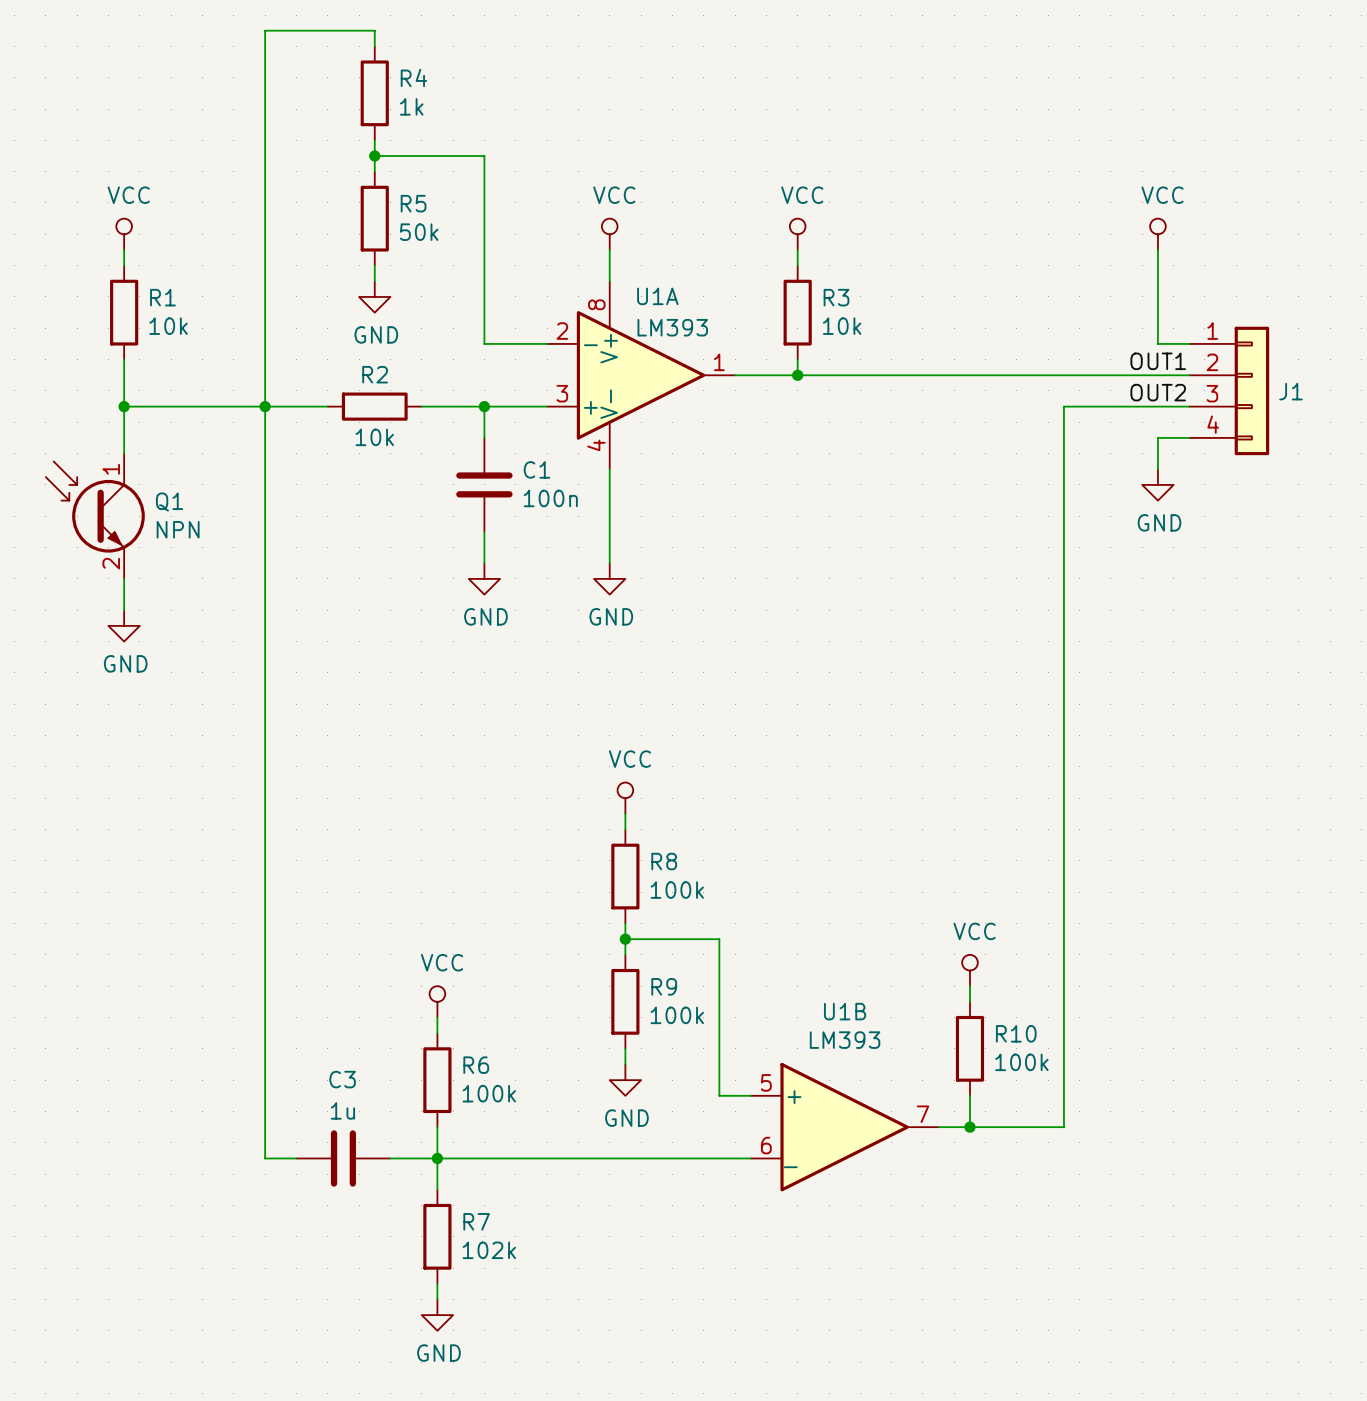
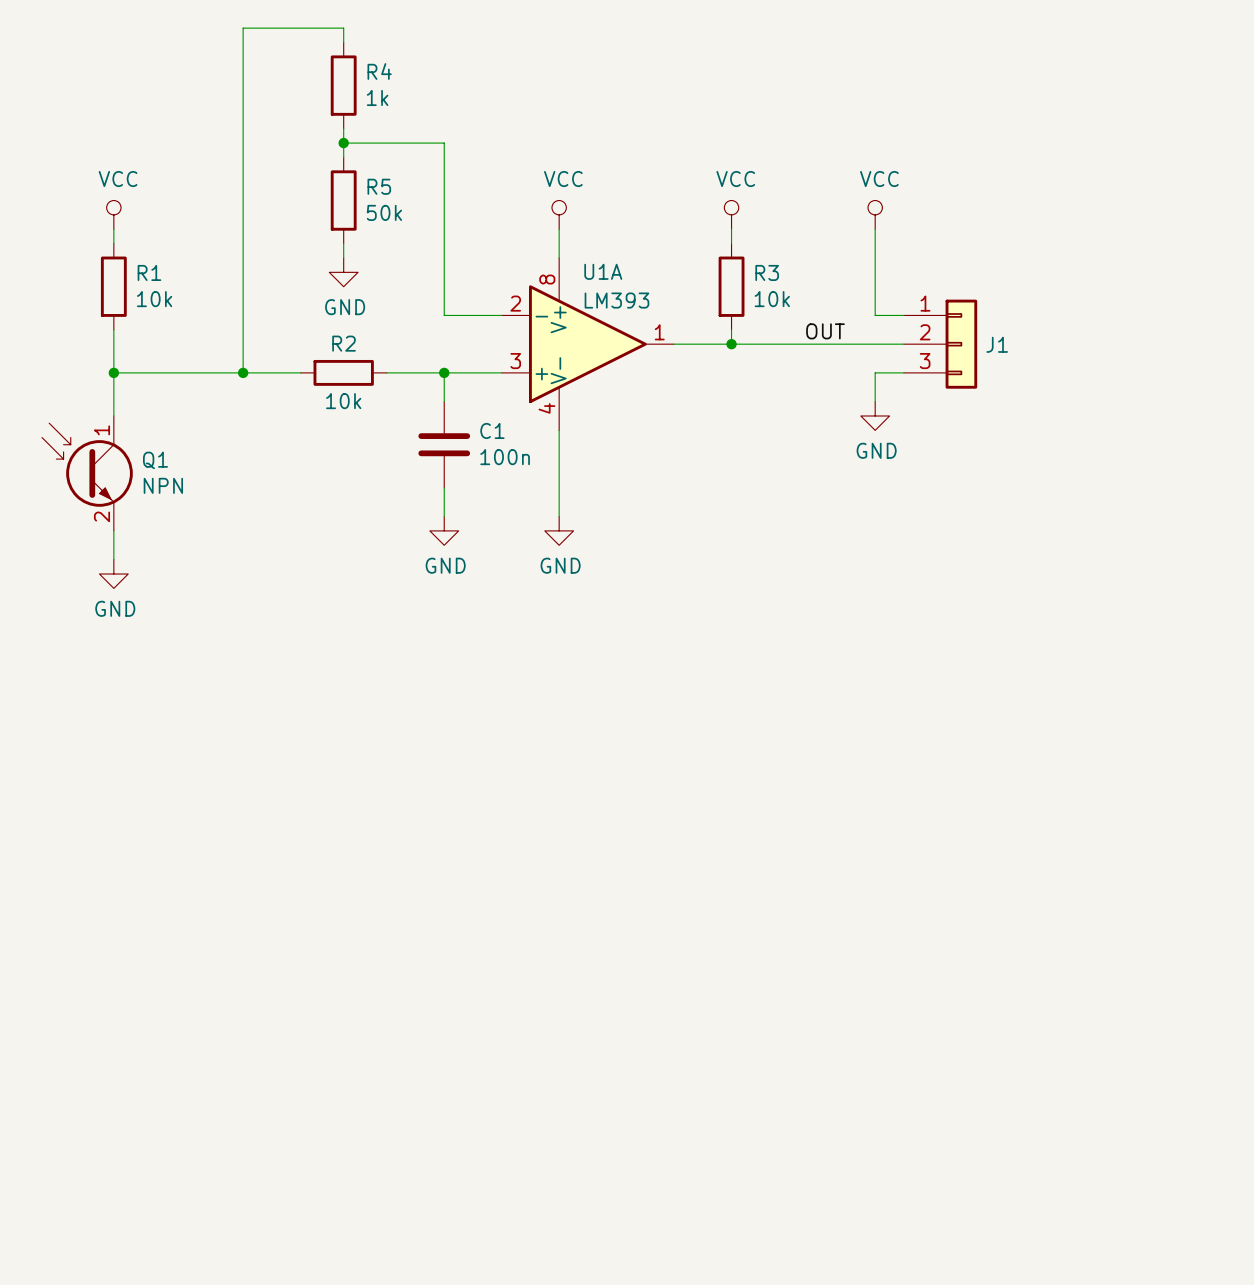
power symbol position: VCC (1157, 234) -> VCC (875, 214)
wire: (1157, 249) (1157, 343) (1189, 343) -> (875, 229) (875, 315) (903, 315)
J1 symbol: [1189, 326, 1270, 456] -> [903, 299, 978, 389]
label: none -> OUT (825, 331)
label: OUT1 (1158, 361) -> none
wire: (985, 375) (1189, 375) -> none
label: OUT2 (1158, 392) -> none
wire: (265, 406) (265, 1158) (296, 1158) -> none
wire: (1189, 406) (1063, 406) (1063, 1127) (938, 1127) -> none
wire: (1189, 437) (1157, 437) (1157, 469) -> (903, 372) (875, 372) (875, 401)
power symbol position: GND (1157, 484) -> GND (875, 415)
power symbol: VCC (625, 798) -> none
wire: (625, 813) (625, 829) -> none
R8: 100k (625, 876) -> none
wire: (625, 923) (625, 954) -> none
wire: (625, 939) (719, 939) (719, 1095) (750, 1095) -> none
junction: (625, 939) -> none
power symbol: VCC (969, 970) -> none
wire: (969, 986) (969, 1001) -> none
power symbol: VCC (437, 1001) -> none
R9: 100k (625, 1001) -> none
wire: (437, 1017) (437, 1033) -> none
wire: (625, 1048) (625, 1064) -> none
R10: 100k (969, 1048) -> none
R6: 100k (437, 1080) -> none
power symbol: GND (625, 1080) -> none
wire: (969, 1095) (969, 1127) -> none
wire: (437, 1127) (437, 1189) -> none
U1B: LM393 (844, 1127) -> none
junction: (969, 1127) -> none
C3: 1u (343, 1158) -> none
wire: (390, 1158) (750, 1158) -> none
junction: (437, 1158) -> none
R7: 102k (437, 1236) -> none
wire: (437, 1283) (437, 1299) -> none
power symbol: GND (437, 1315) -> none

